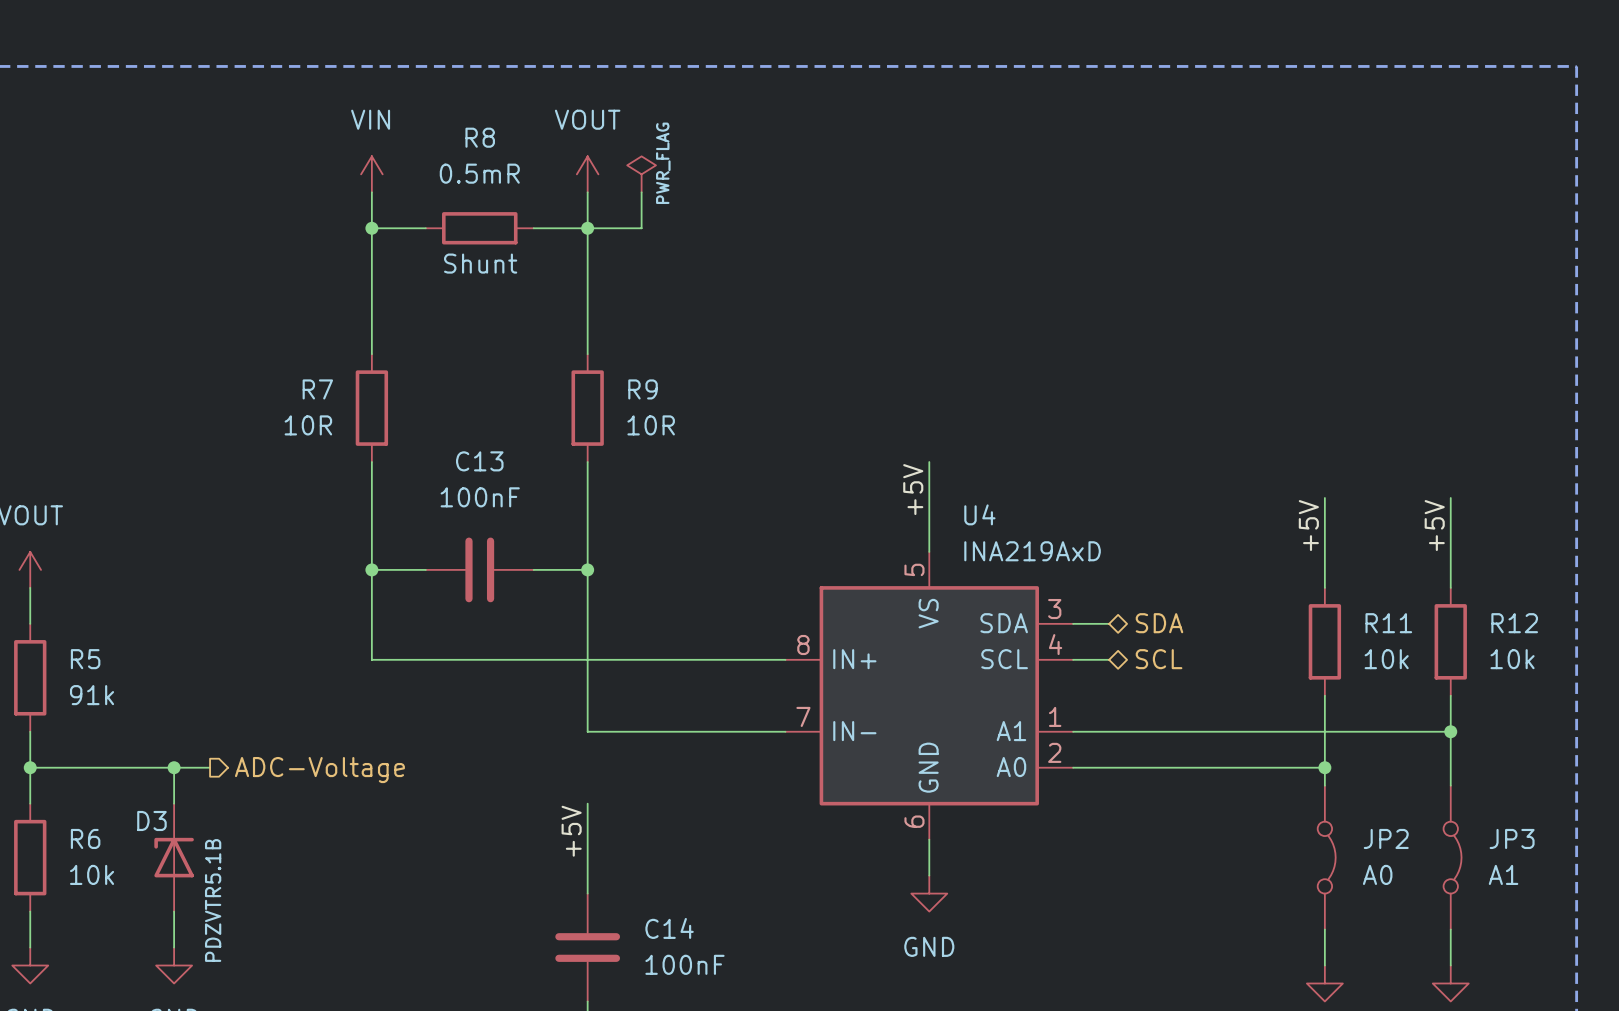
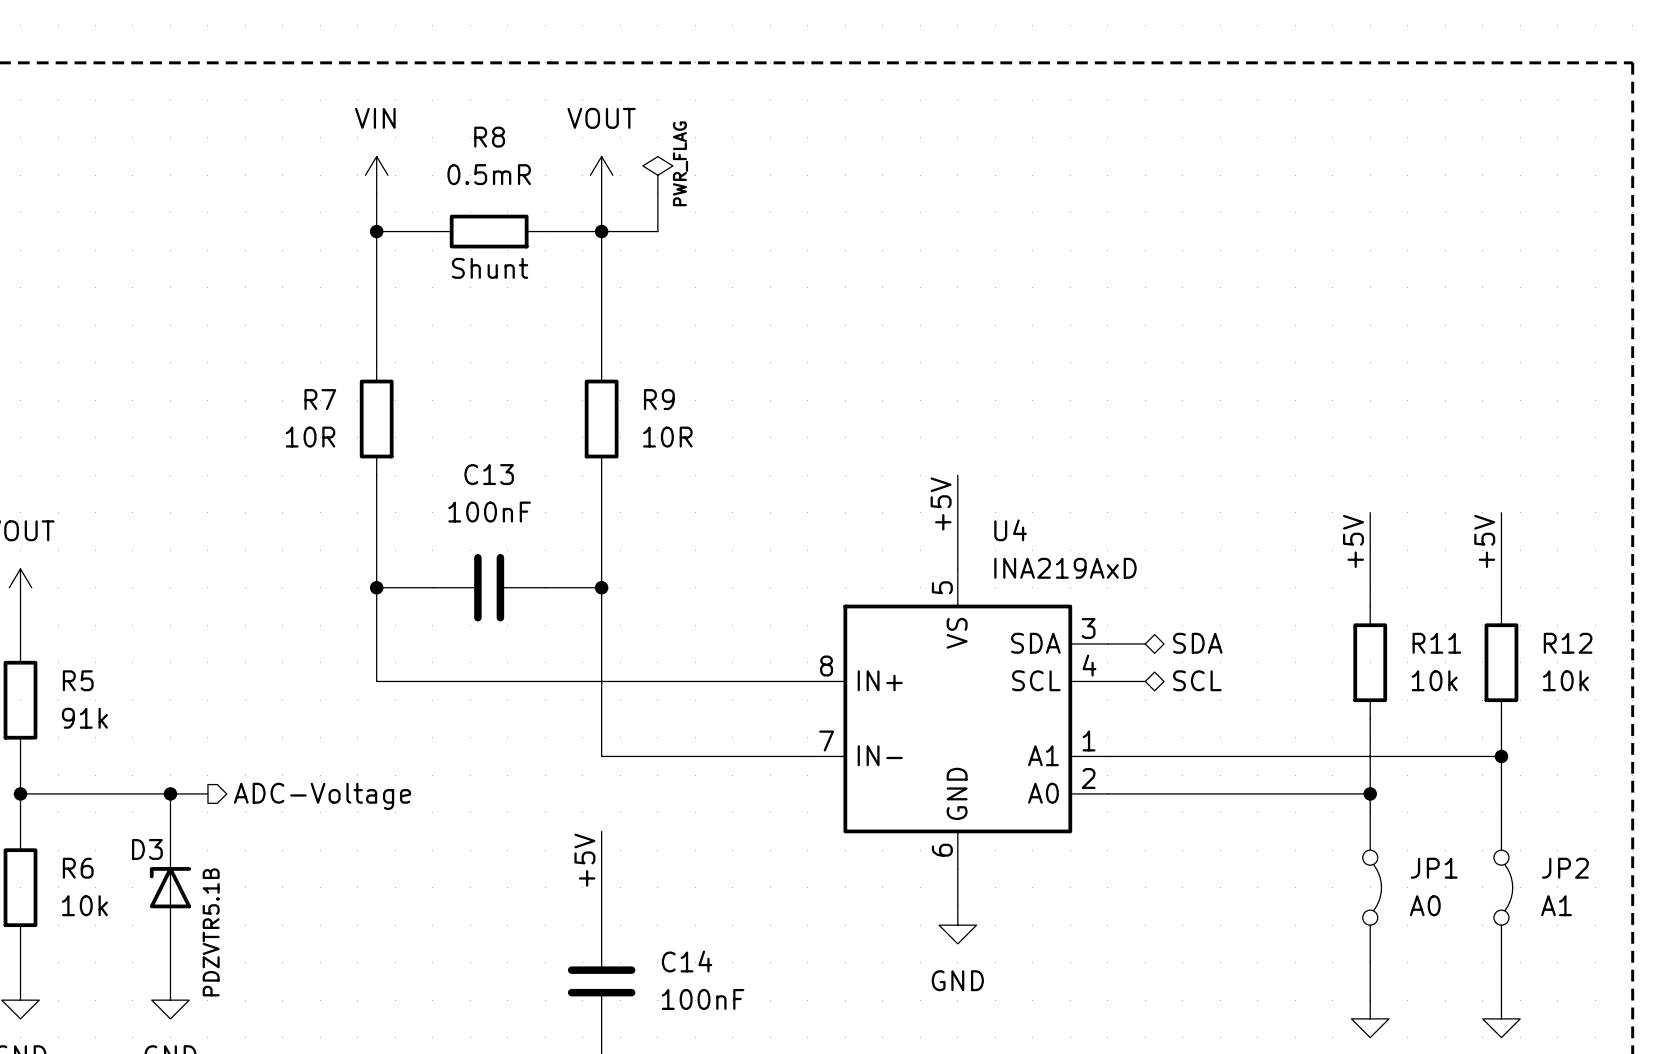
JP2 name: JP2 (1386, 838) -> JP1 (1434, 868)
JP3 name: JP3 (1512, 838) -> JP2 (1565, 868)

